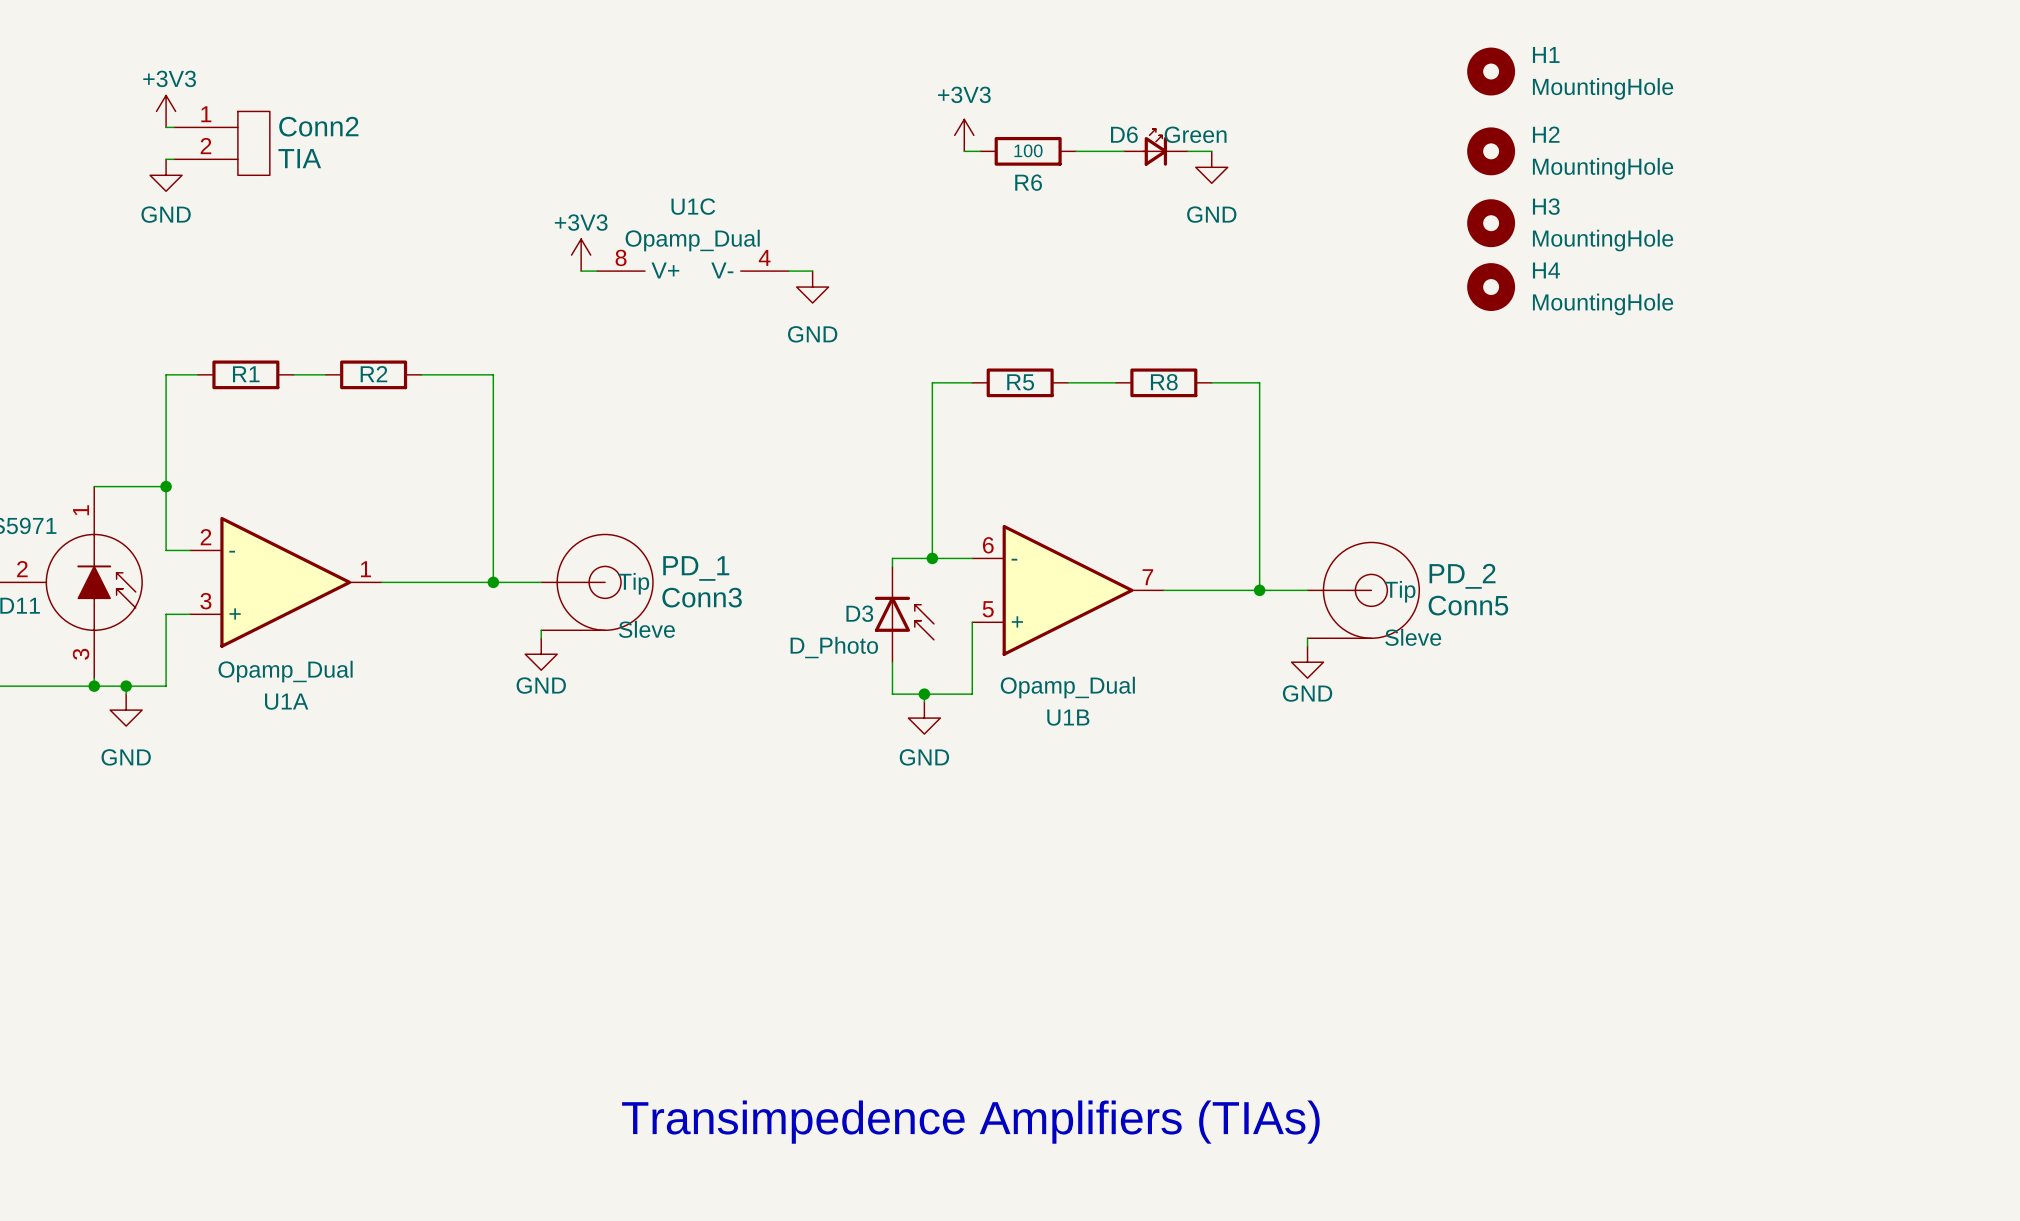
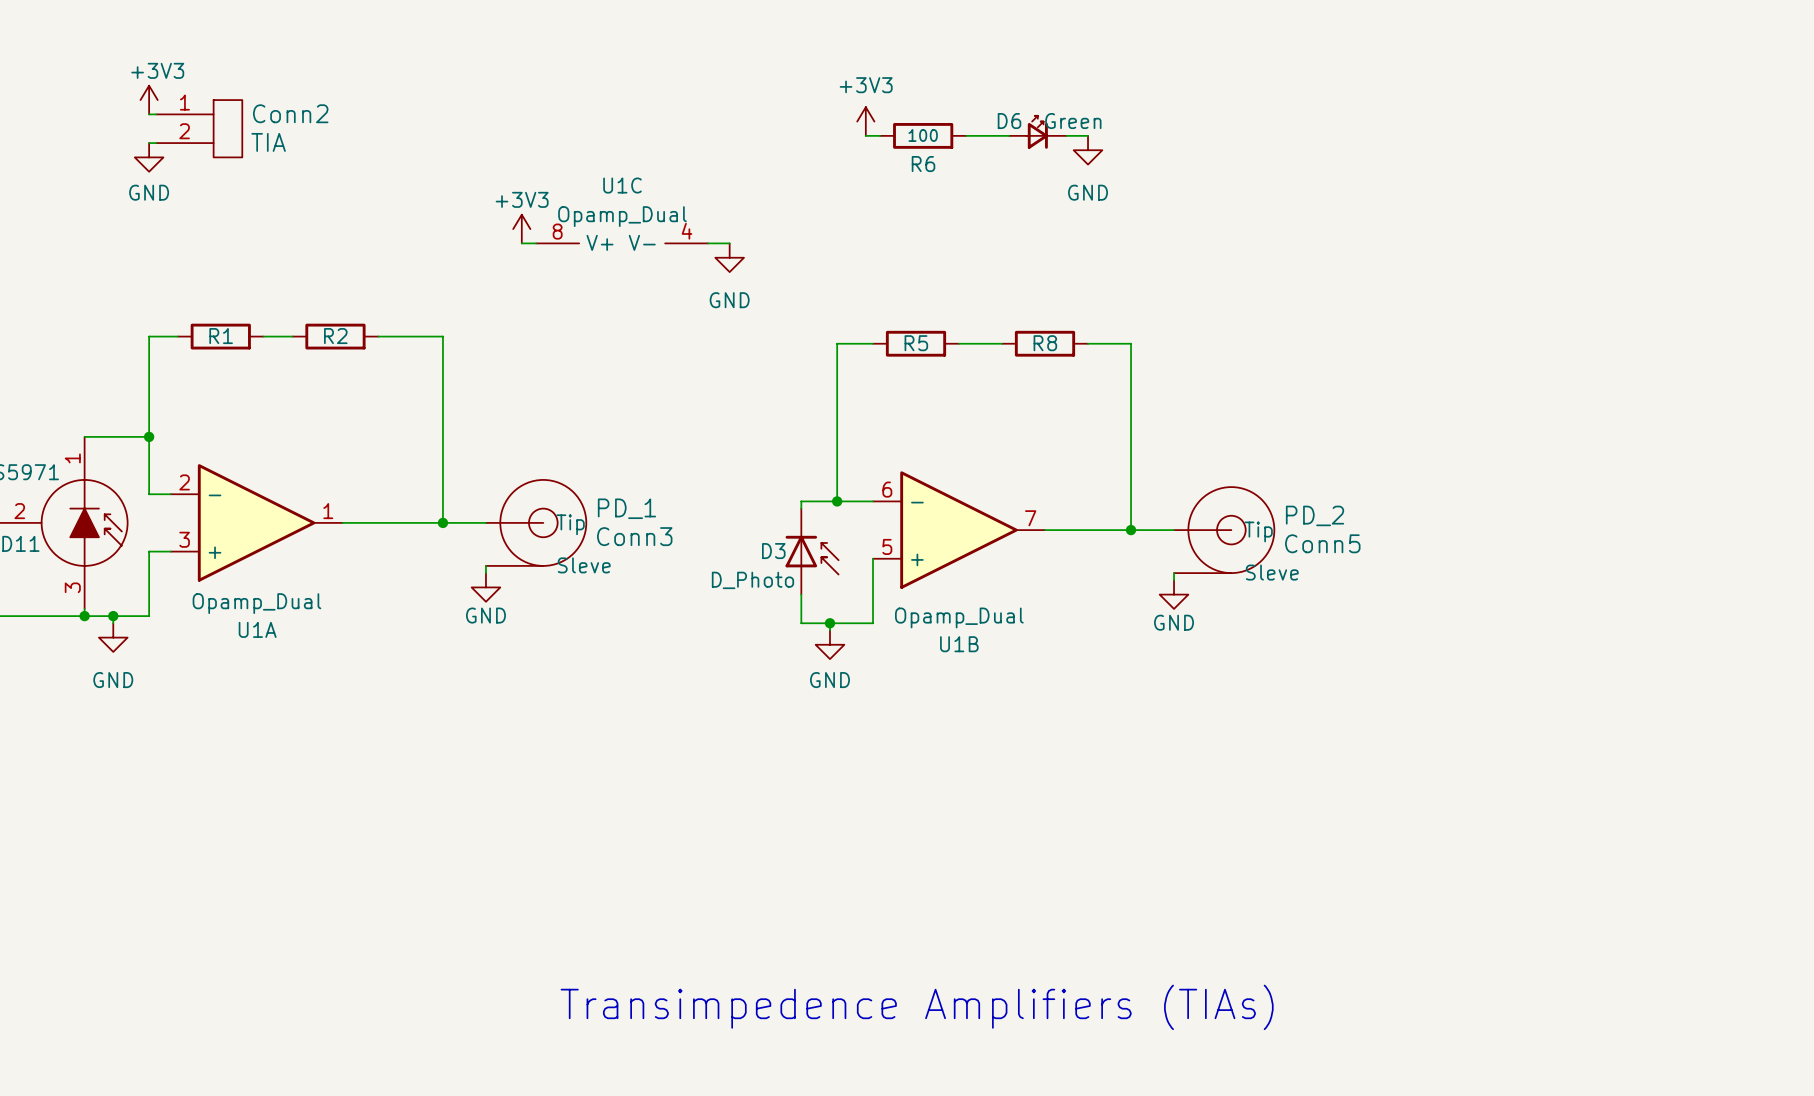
H1: MountingHole (1491, 71) -> none
H2: MountingHole (1491, 151) -> none
H3: MountingHole (1491, 223) -> none
H4: MountingHole (1491, 287) -> none

